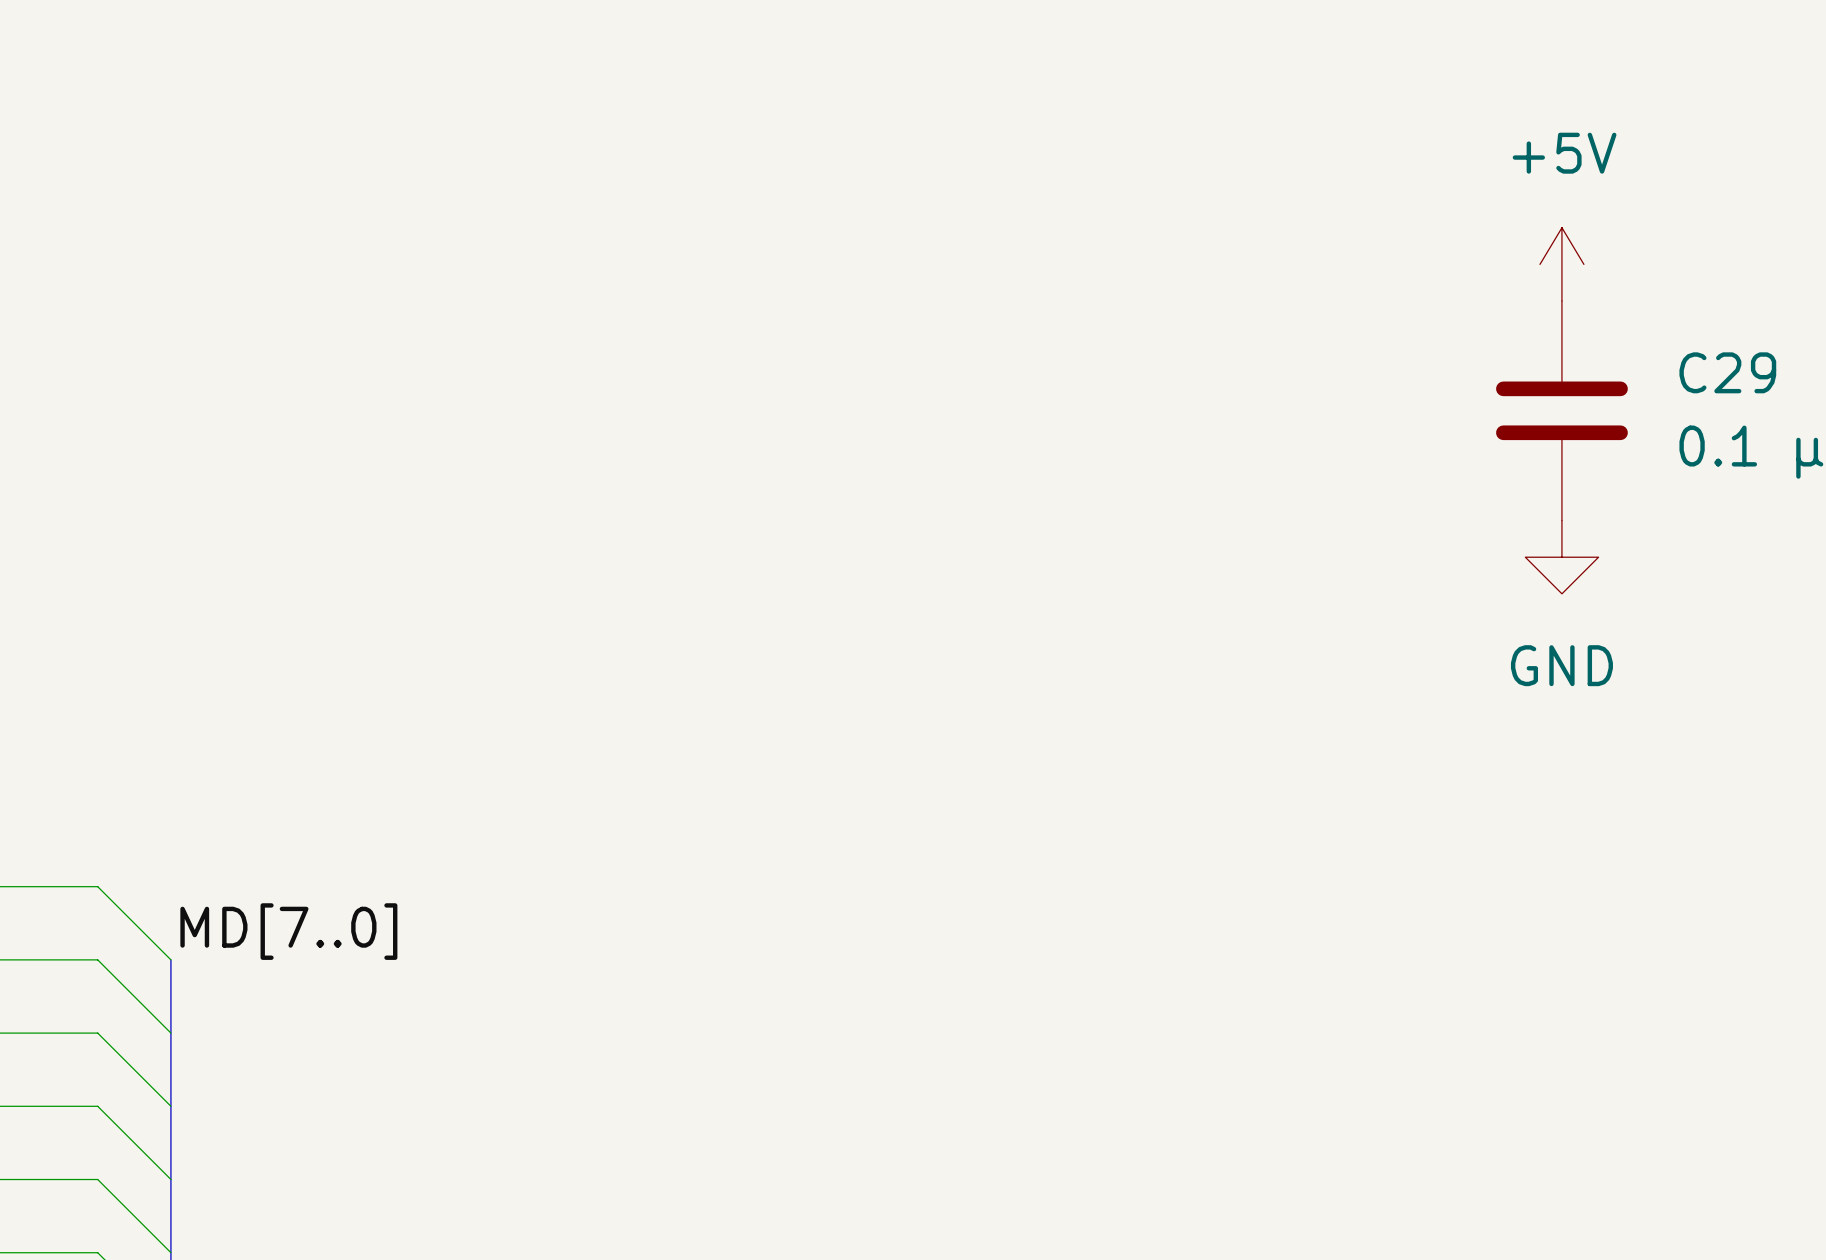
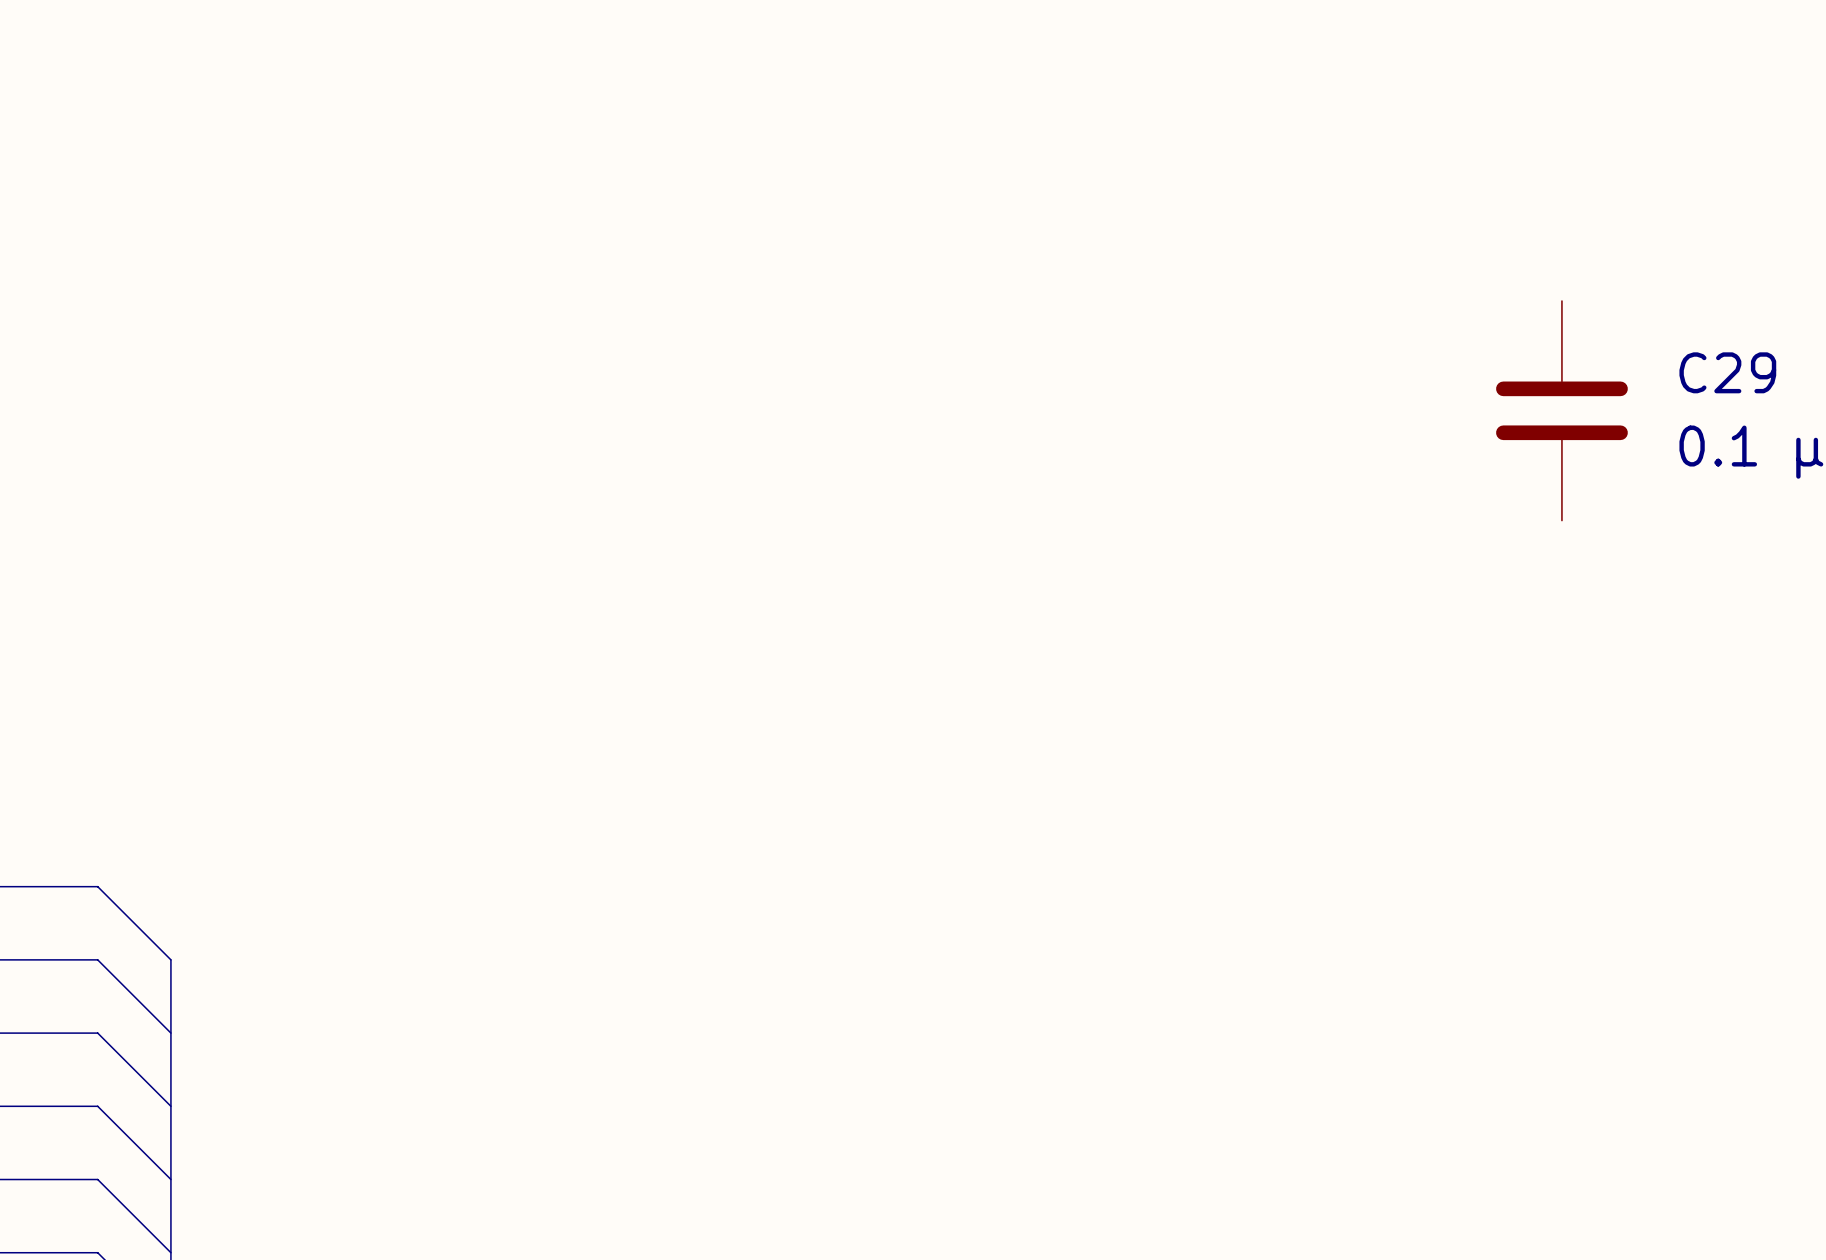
power symbol: +5V (1561, 264) -> none
power symbol: GND (1561, 557) -> none
label: MD[7..0] (288, 931) -> none

